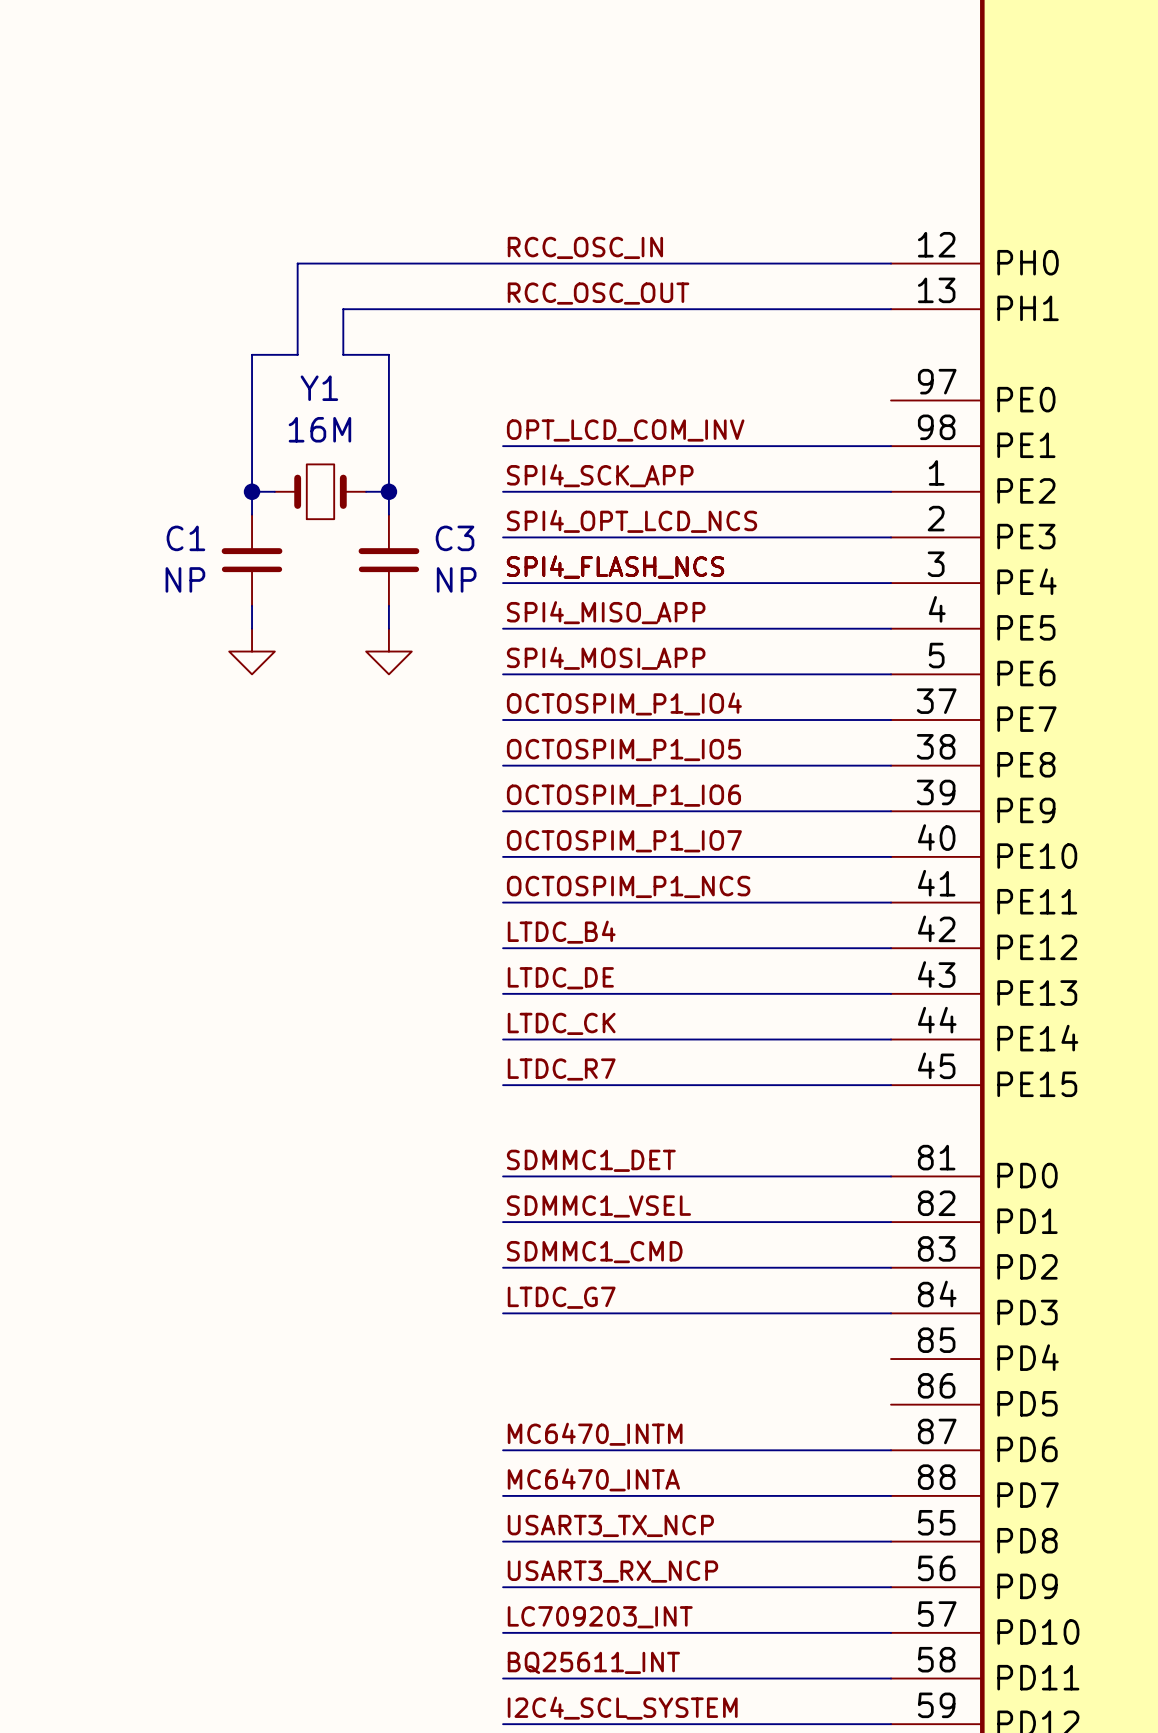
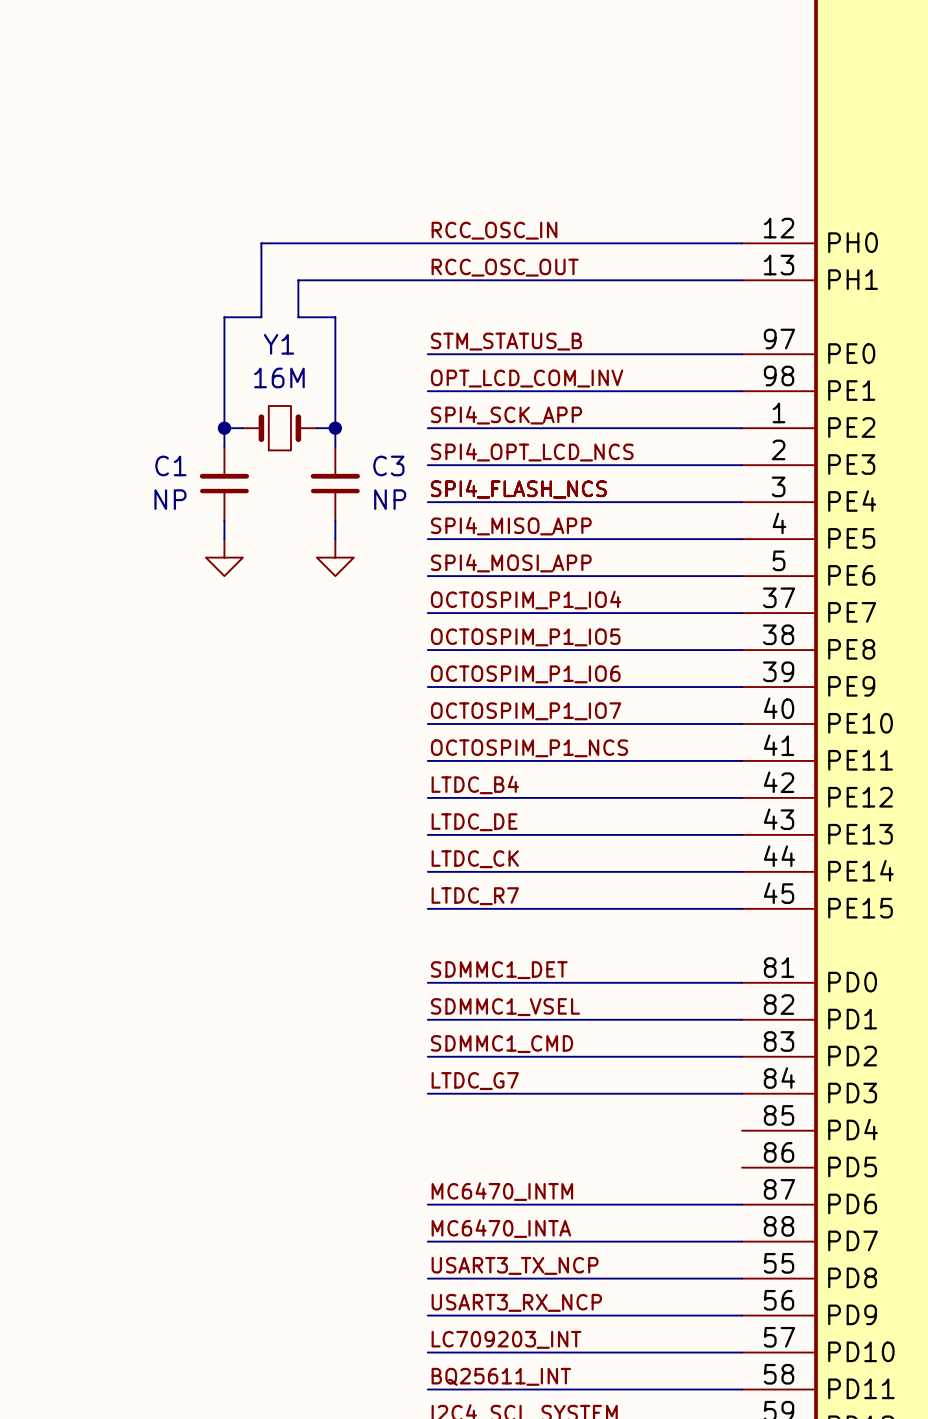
label: none -> STM_STATUS_B (506, 341)
wire: none -> (427, 354) (742, 354)

